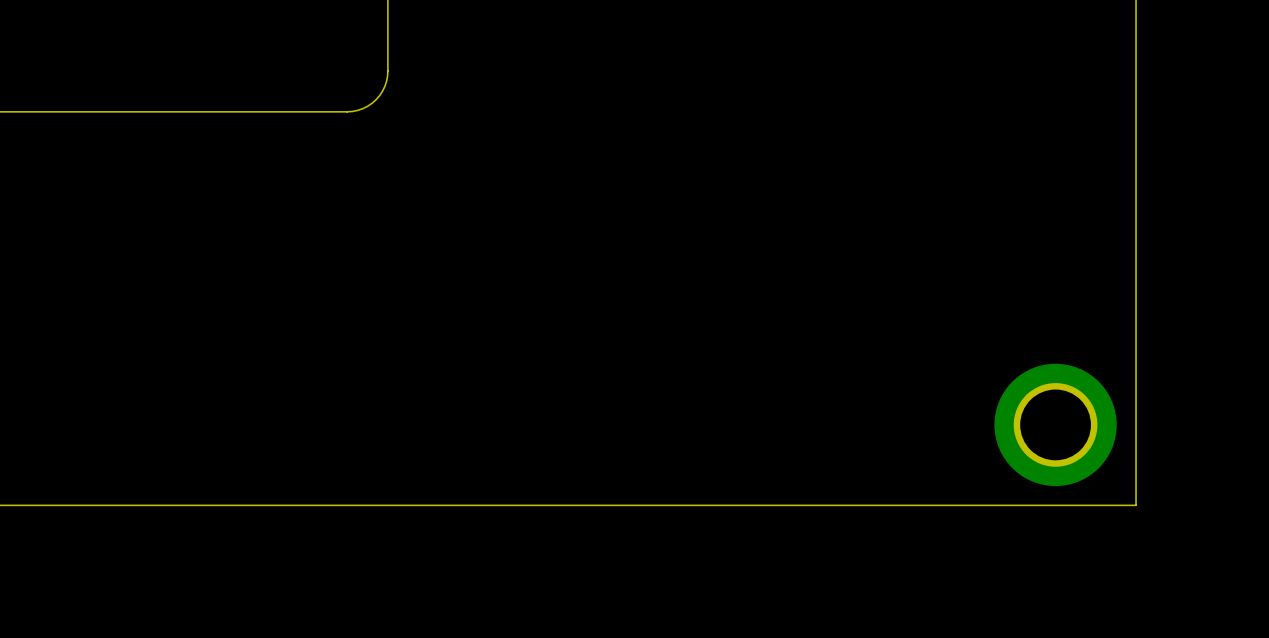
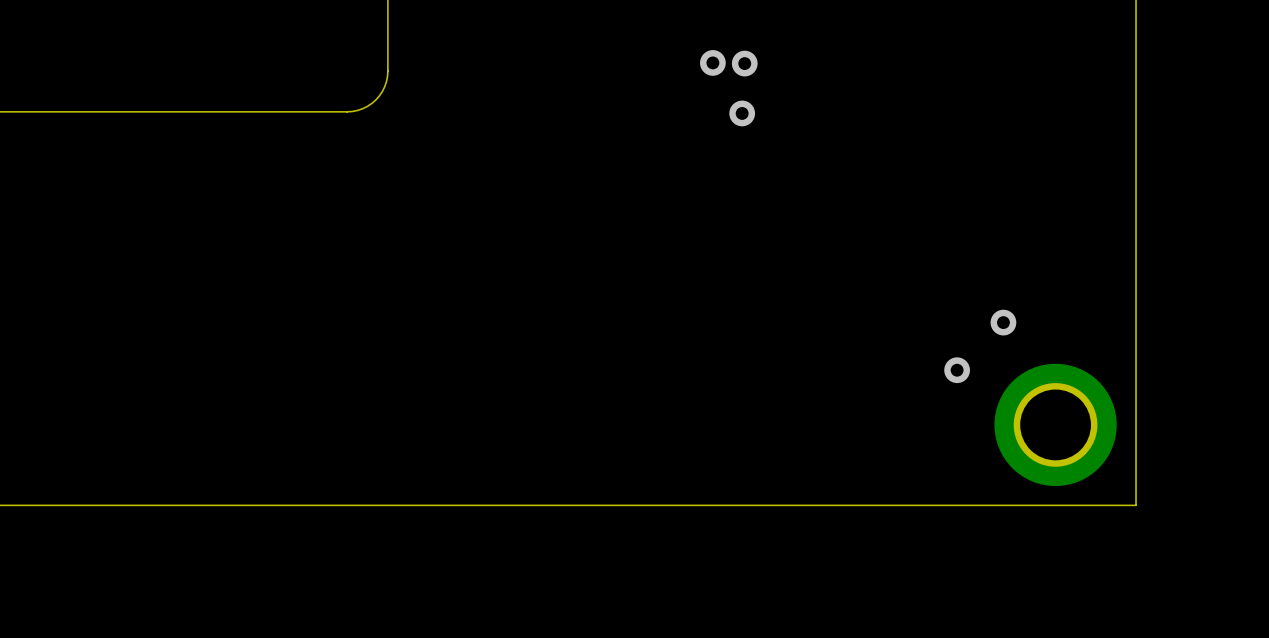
via: none -> (712, 62)
via: none -> (744, 63)
via: none -> (742, 113)
via: none -> (1003, 322)
via: none -> (957, 370)

